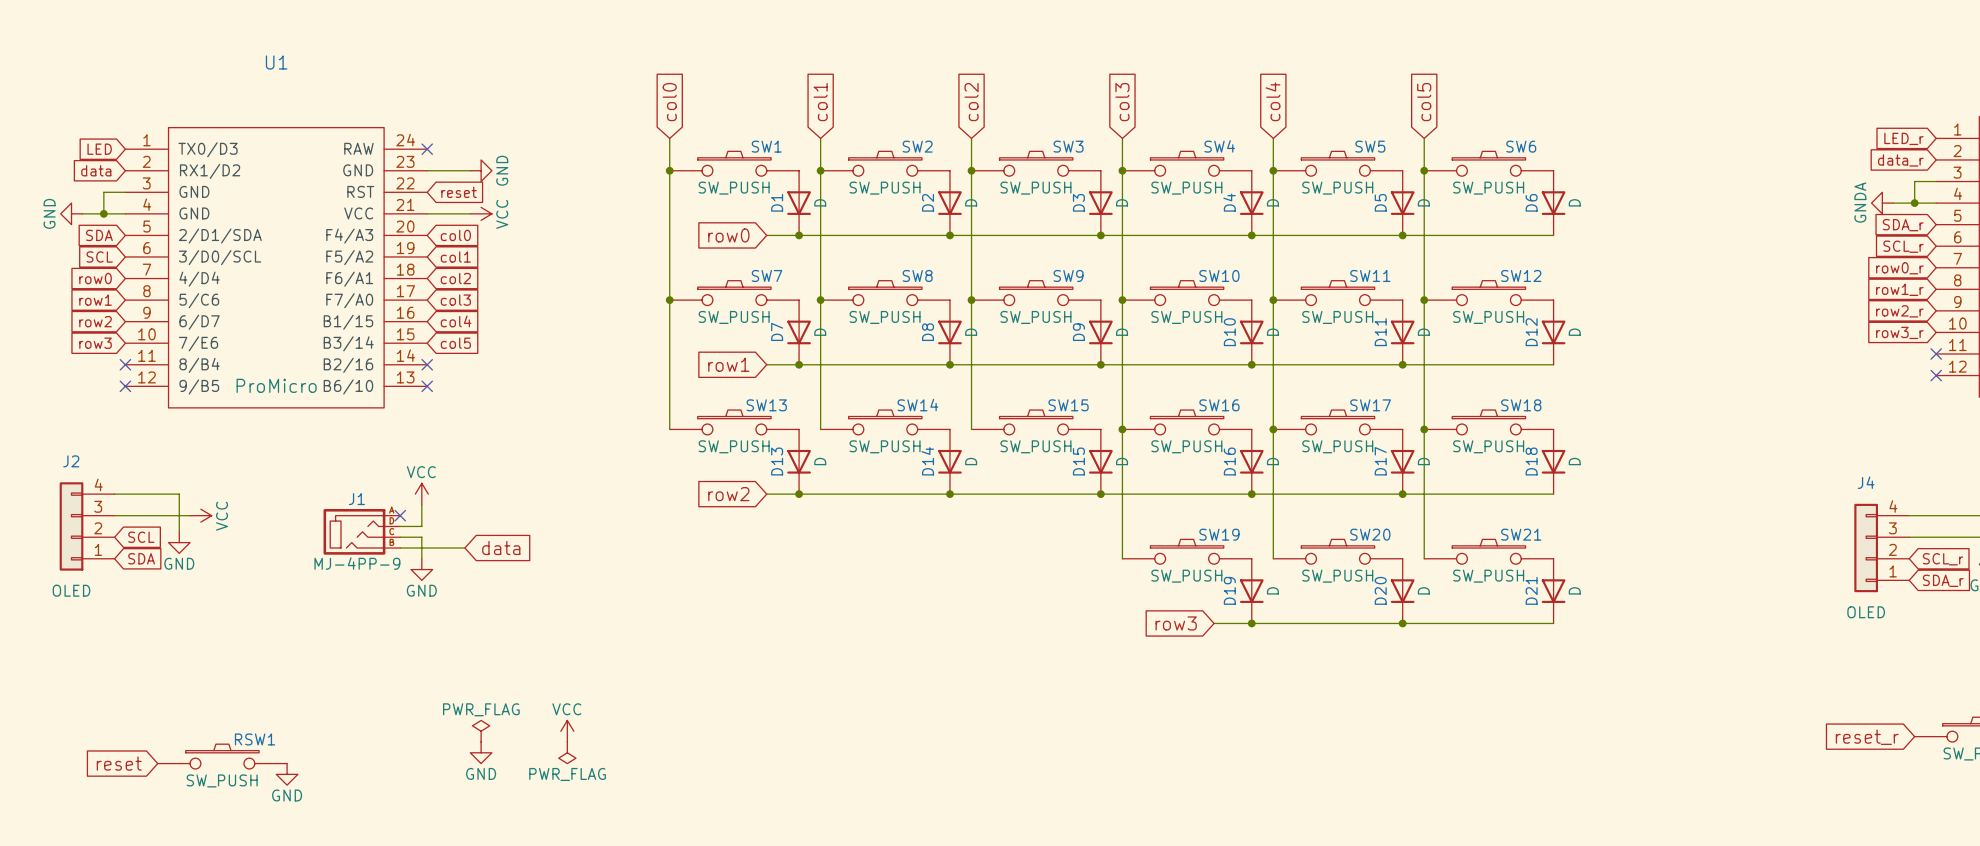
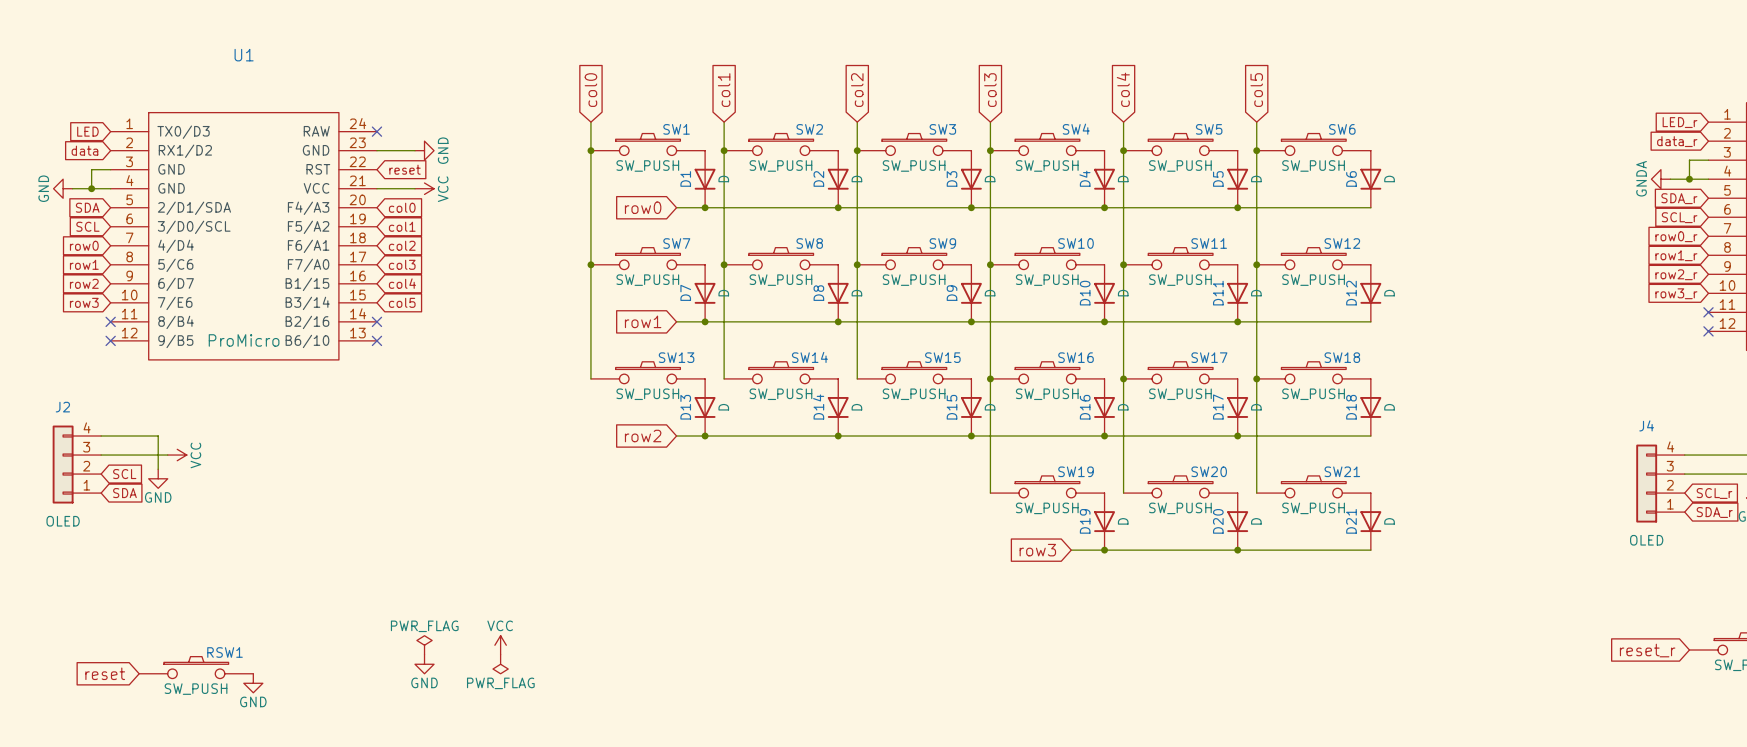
power symbol: VCC (421, 494) -> none
wire: (421, 504) (421, 526) (400, 526) -> none
no-connect mark: (400, 515) -> none
J1: MJ-4PP-9 (361, 531) -> none
wire: (400, 537) (421, 537) (421, 558) -> none
wire: (400, 548) (464, 548) -> none
global label: data (501, 548) -> none
power symbol: GND (421, 569) -> none

